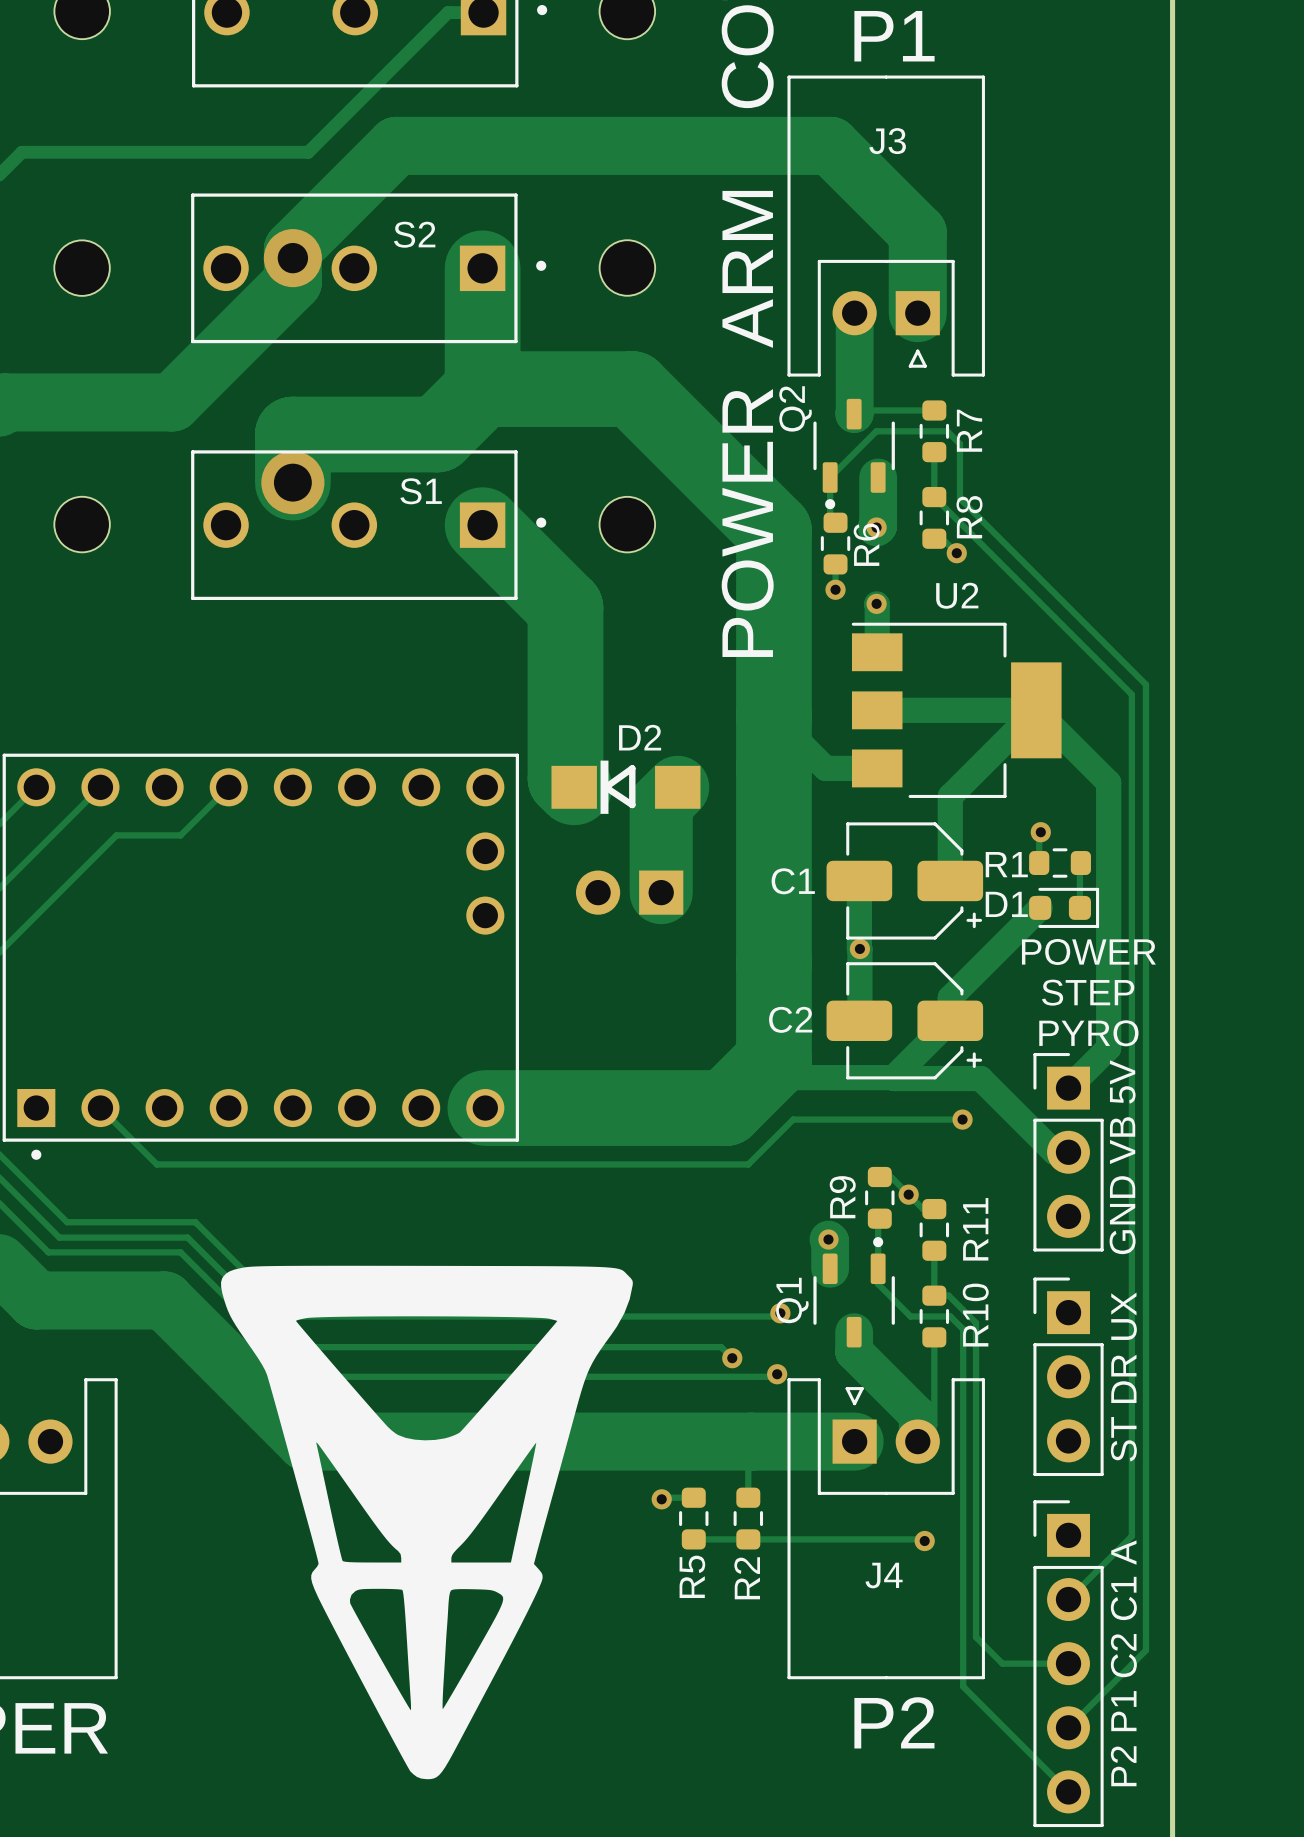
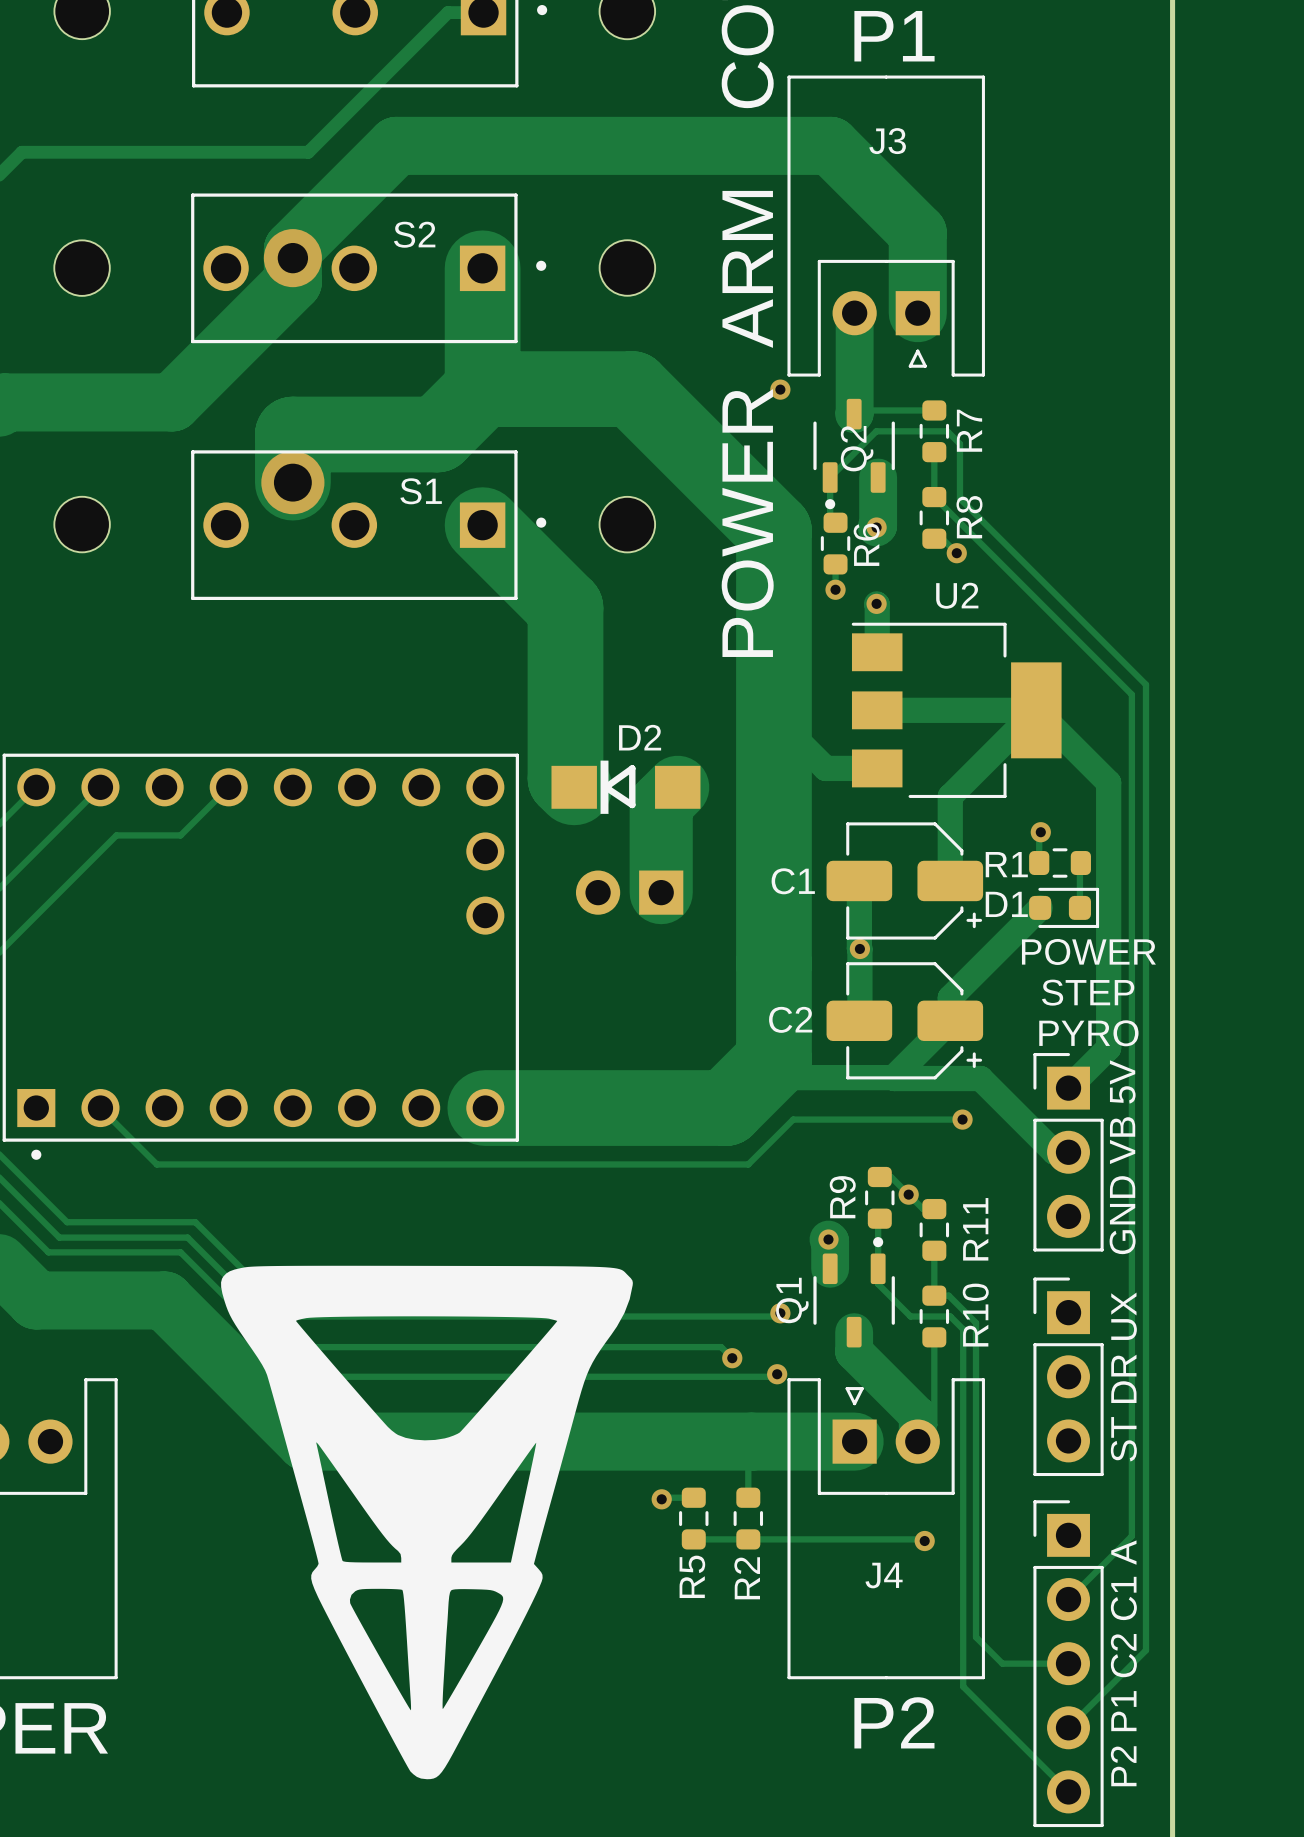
via: none -> (780, 389)
Q2 name position: Q2 (795, 408) -> Q2 (857, 448)

